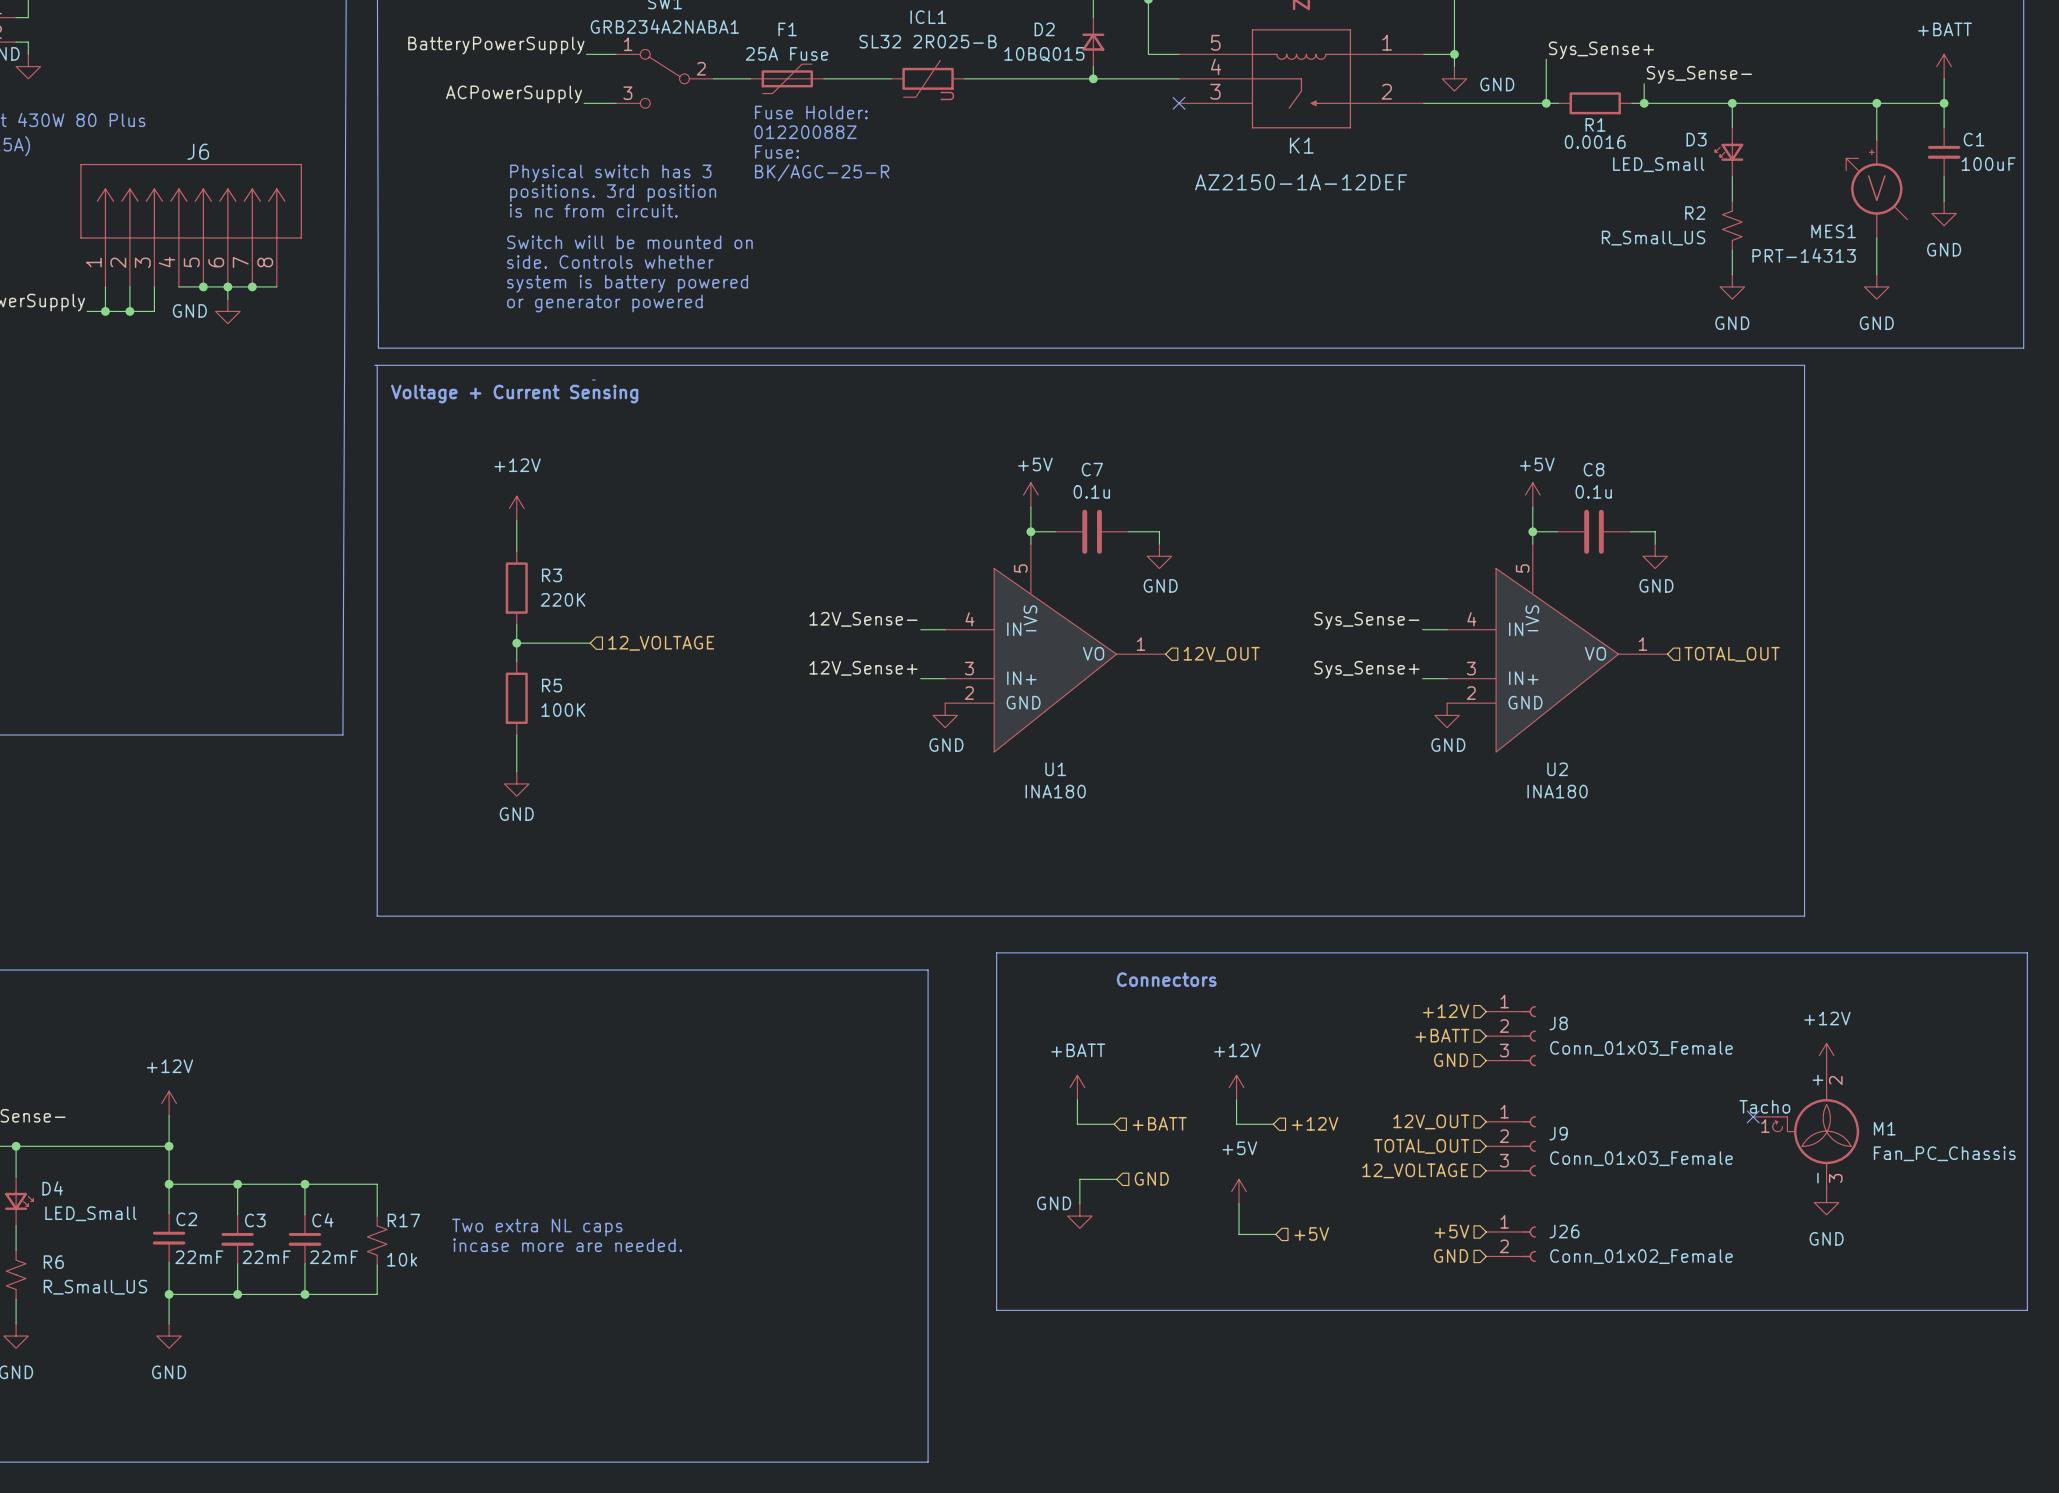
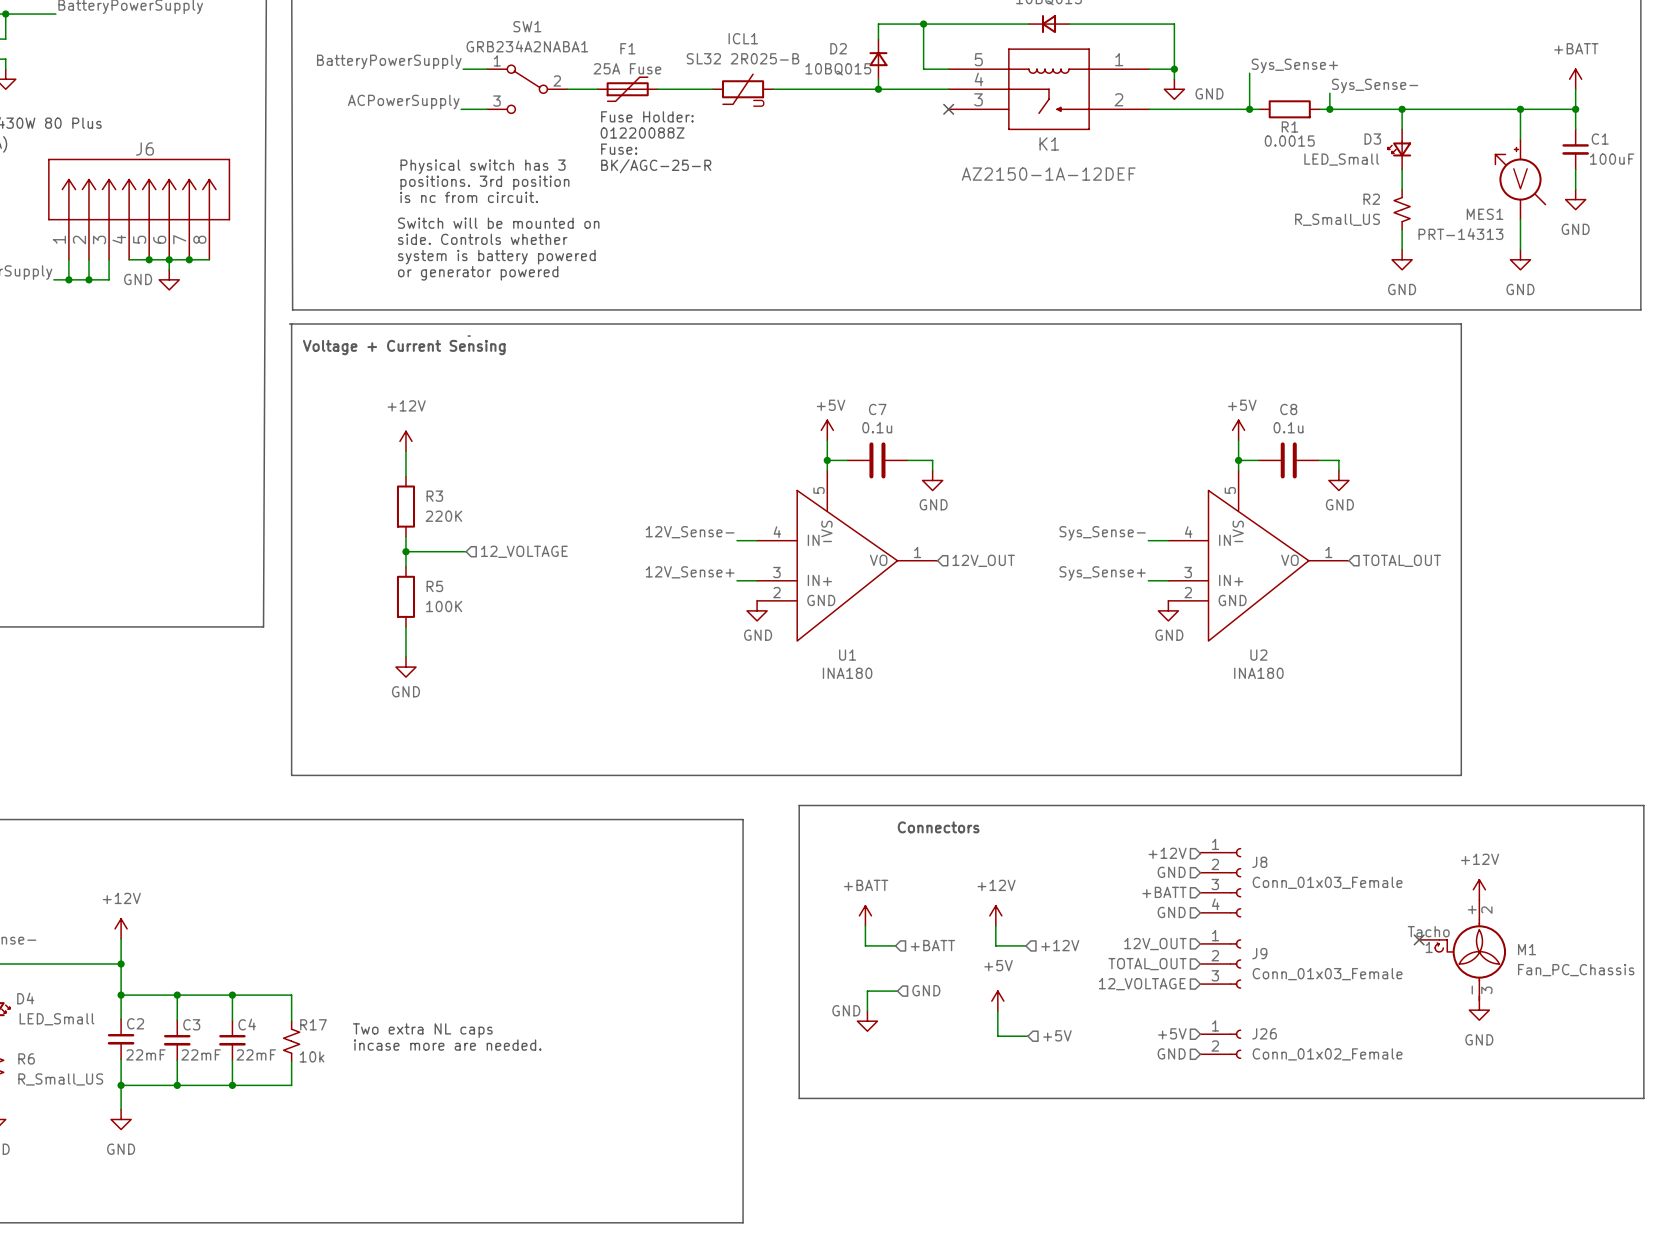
R1 value: 0.0016 (1595, 142) -> 0.0015 (1289, 141)
J8 symbol: [1486, 1006, 1536, 1067] -> [1200, 848, 1242, 918]
hierarchical label: +BATT (1442, 1035) -> GND (1171, 872)
hierarchical label: GND (1451, 1060) -> +BATT (1164, 892)
hierarchical label: none -> GND (1171, 912)

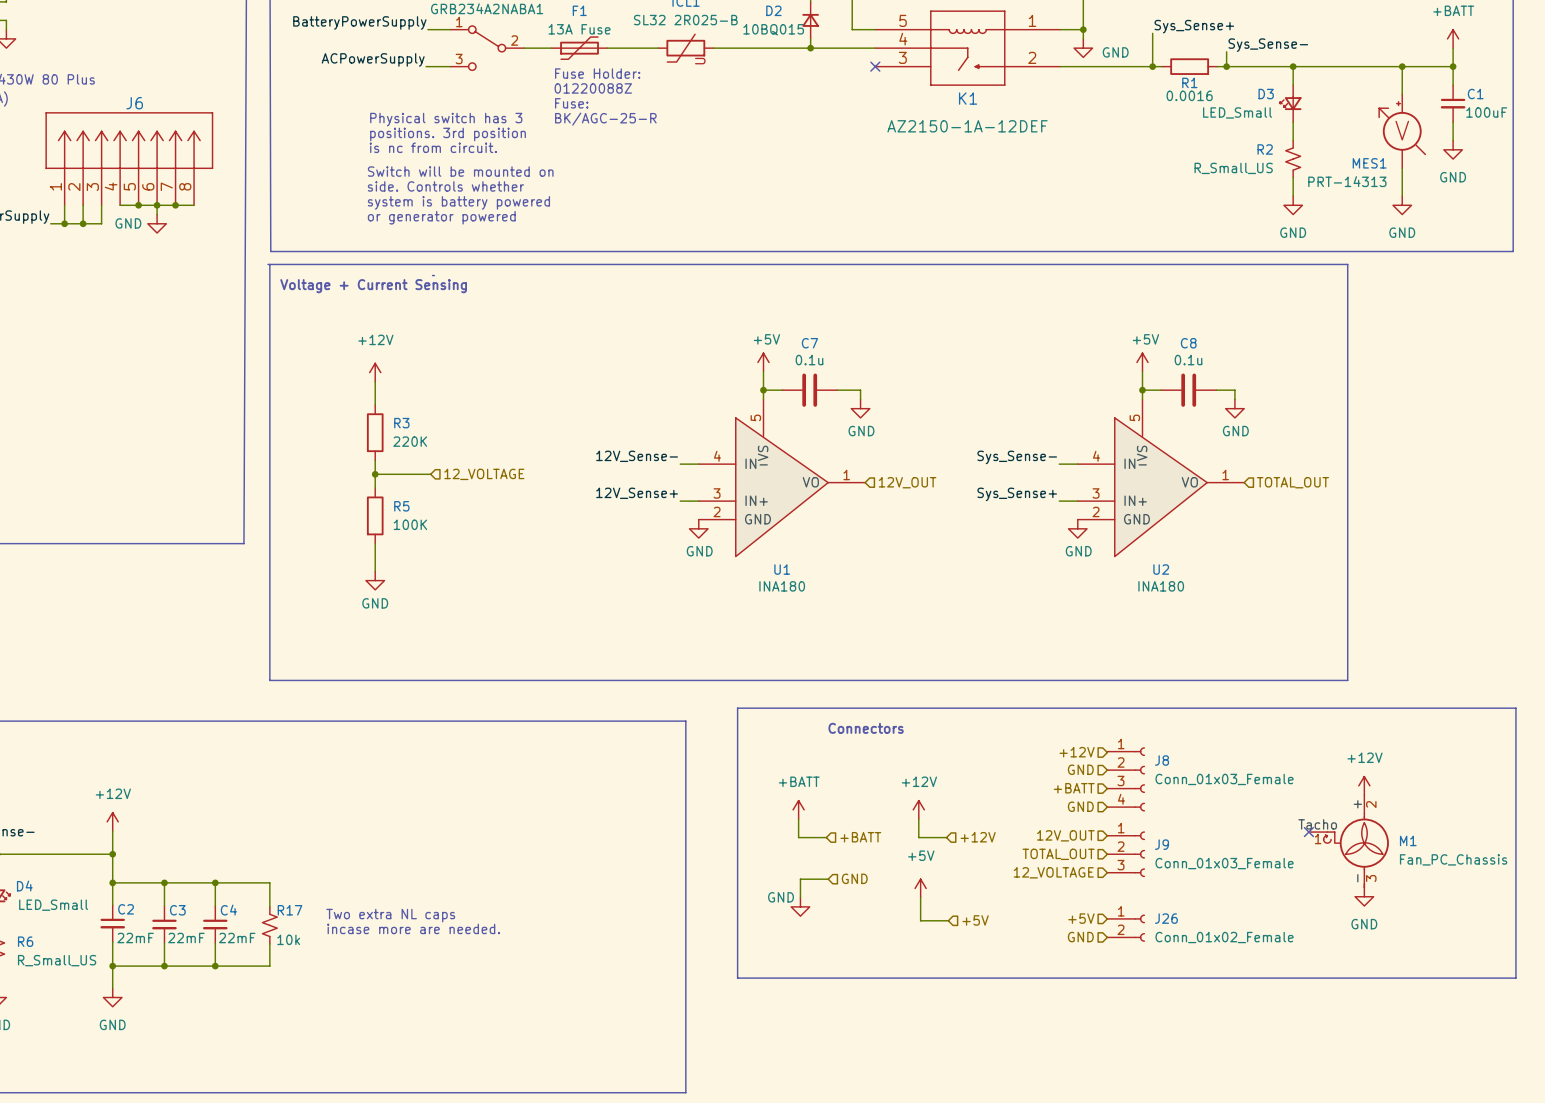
F1 value: 25A Fuse (627, 68) -> 13A Fuse (579, 29)
R1 value: 0.0015 (1289, 141) -> 0.0016 (1189, 95)

